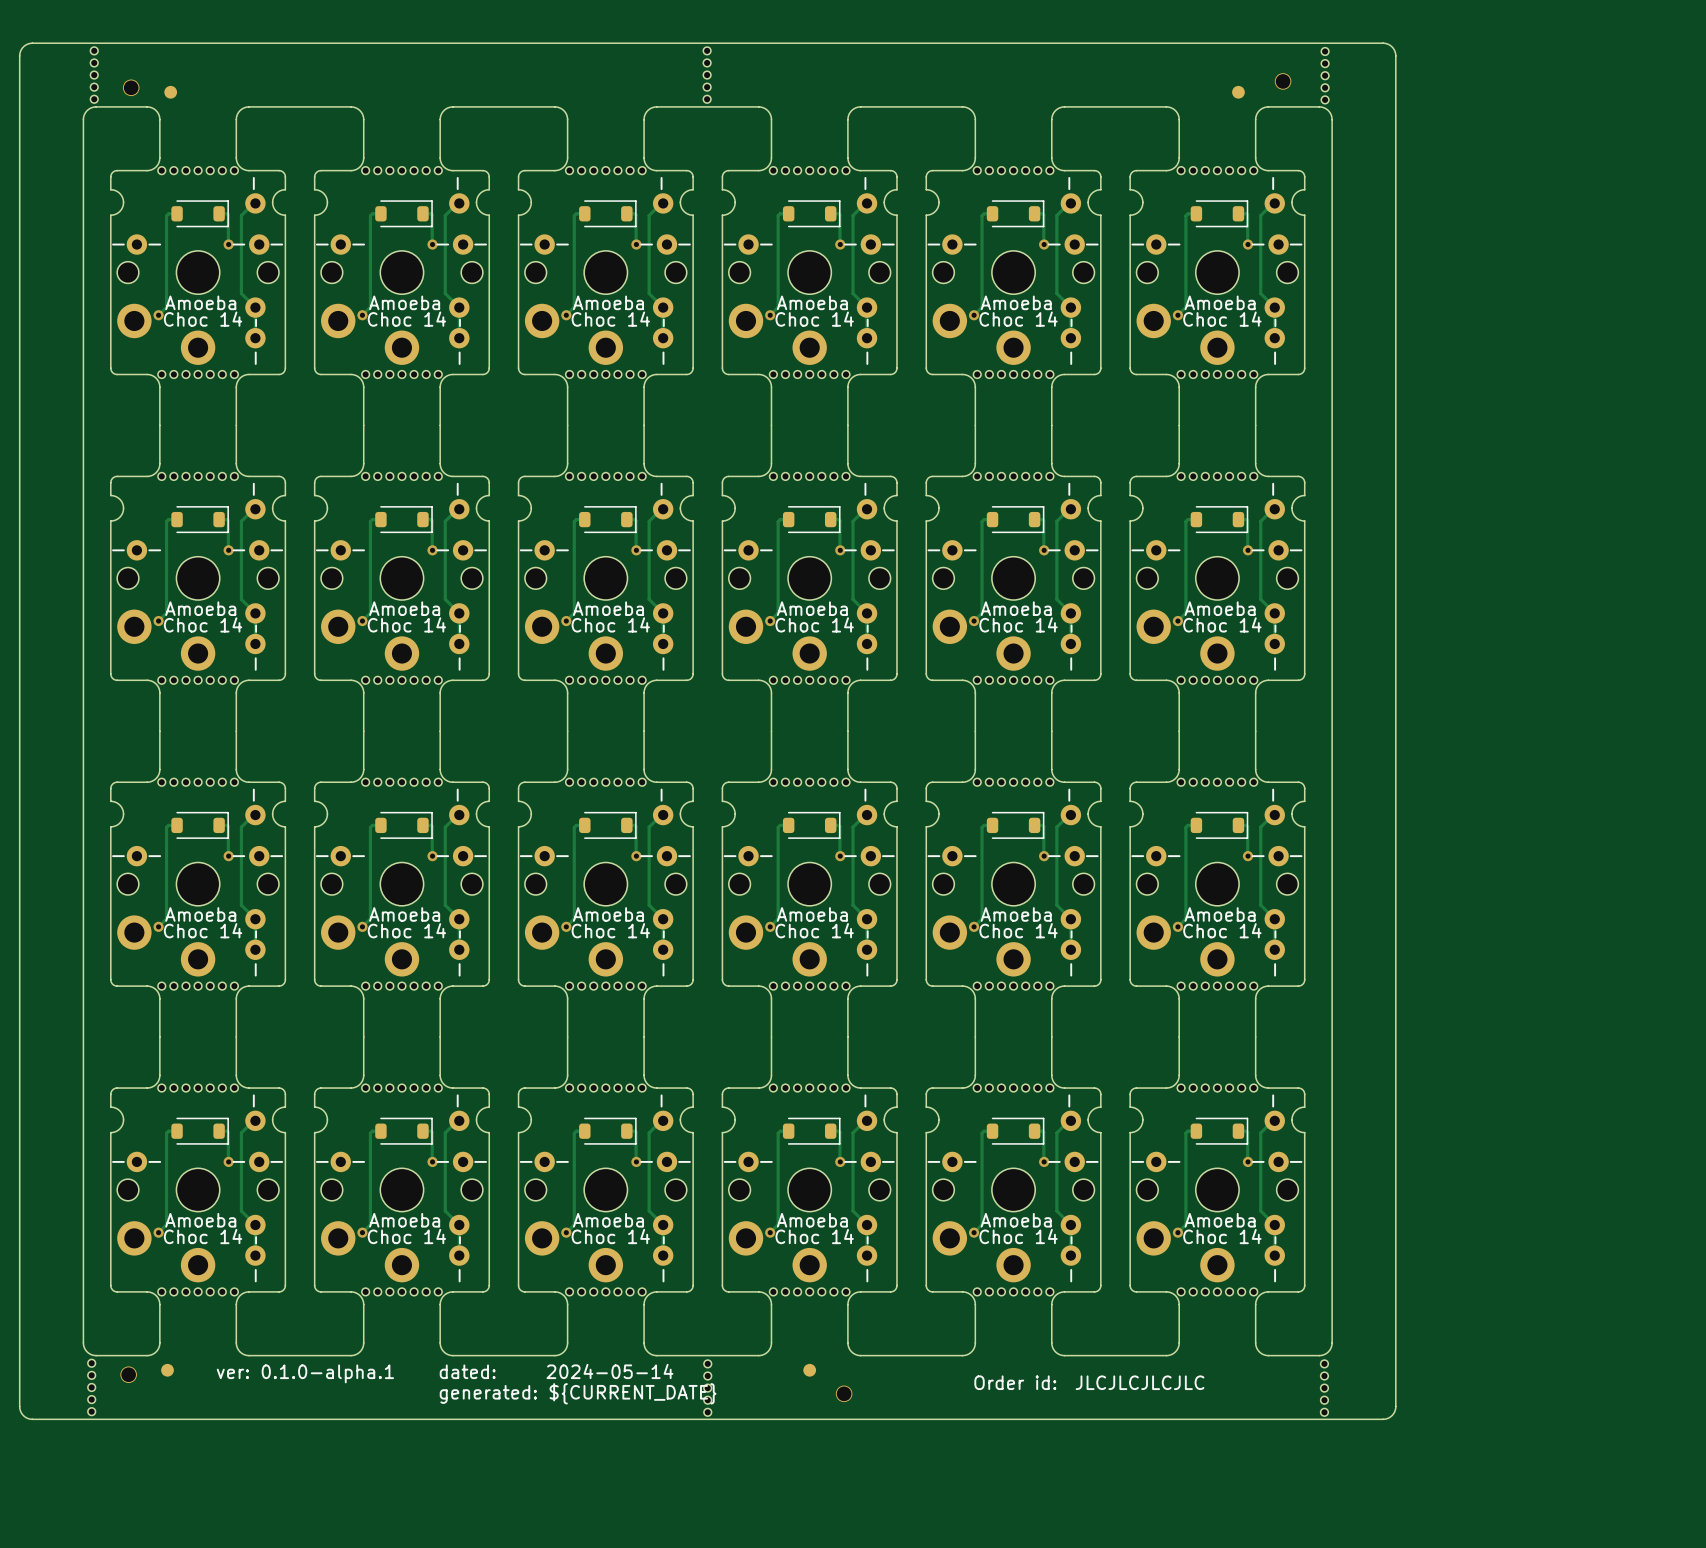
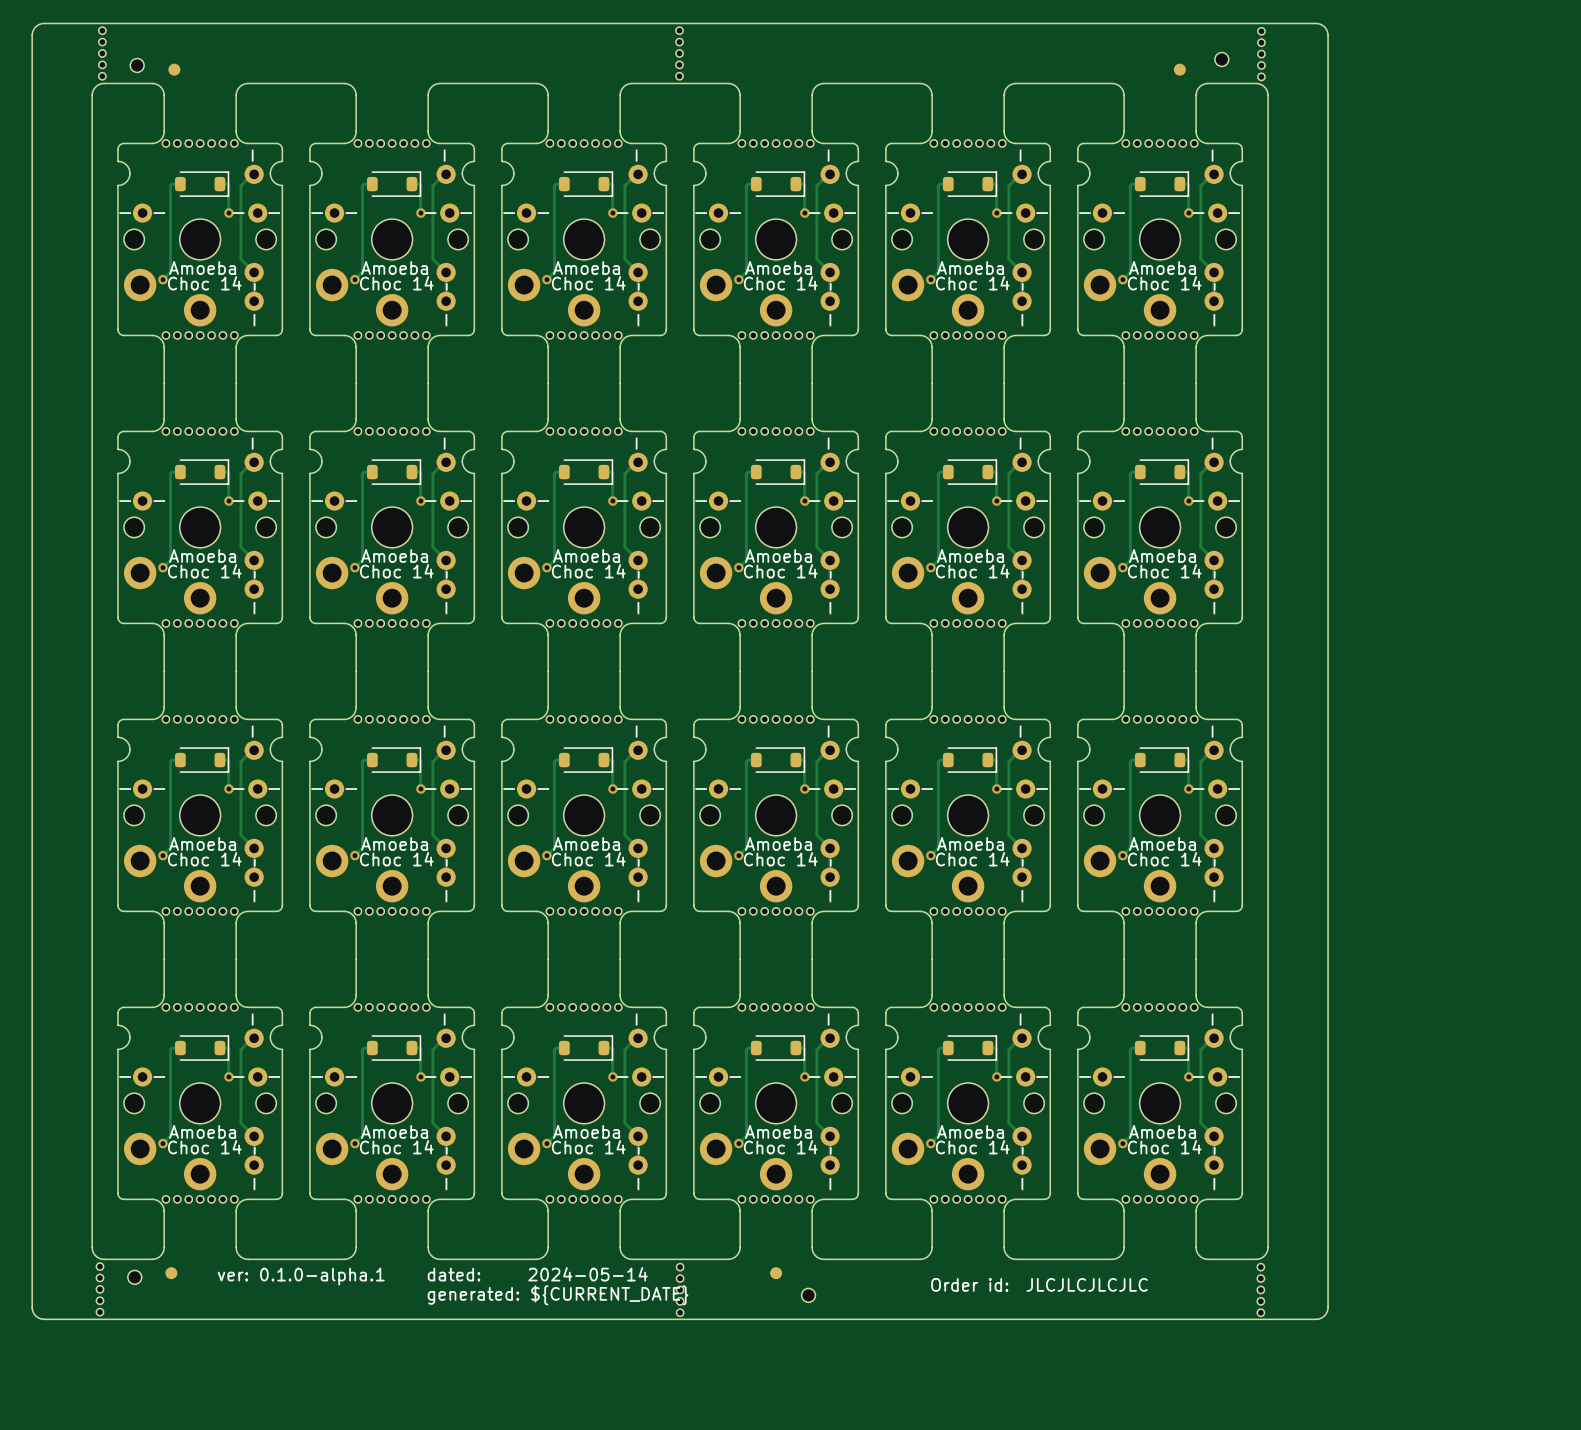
part footprint: [1274, 73, 1292, 90] -> [1214, 52, 1229, 67]
part footprint: [122, 79, 140, 97] -> [130, 58, 145, 73]
part footprint: [120, 1366, 137, 1384] -> [127, 1270, 142, 1285]
part footprint: [835, 1385, 853, 1403] -> [801, 1288, 816, 1303]

